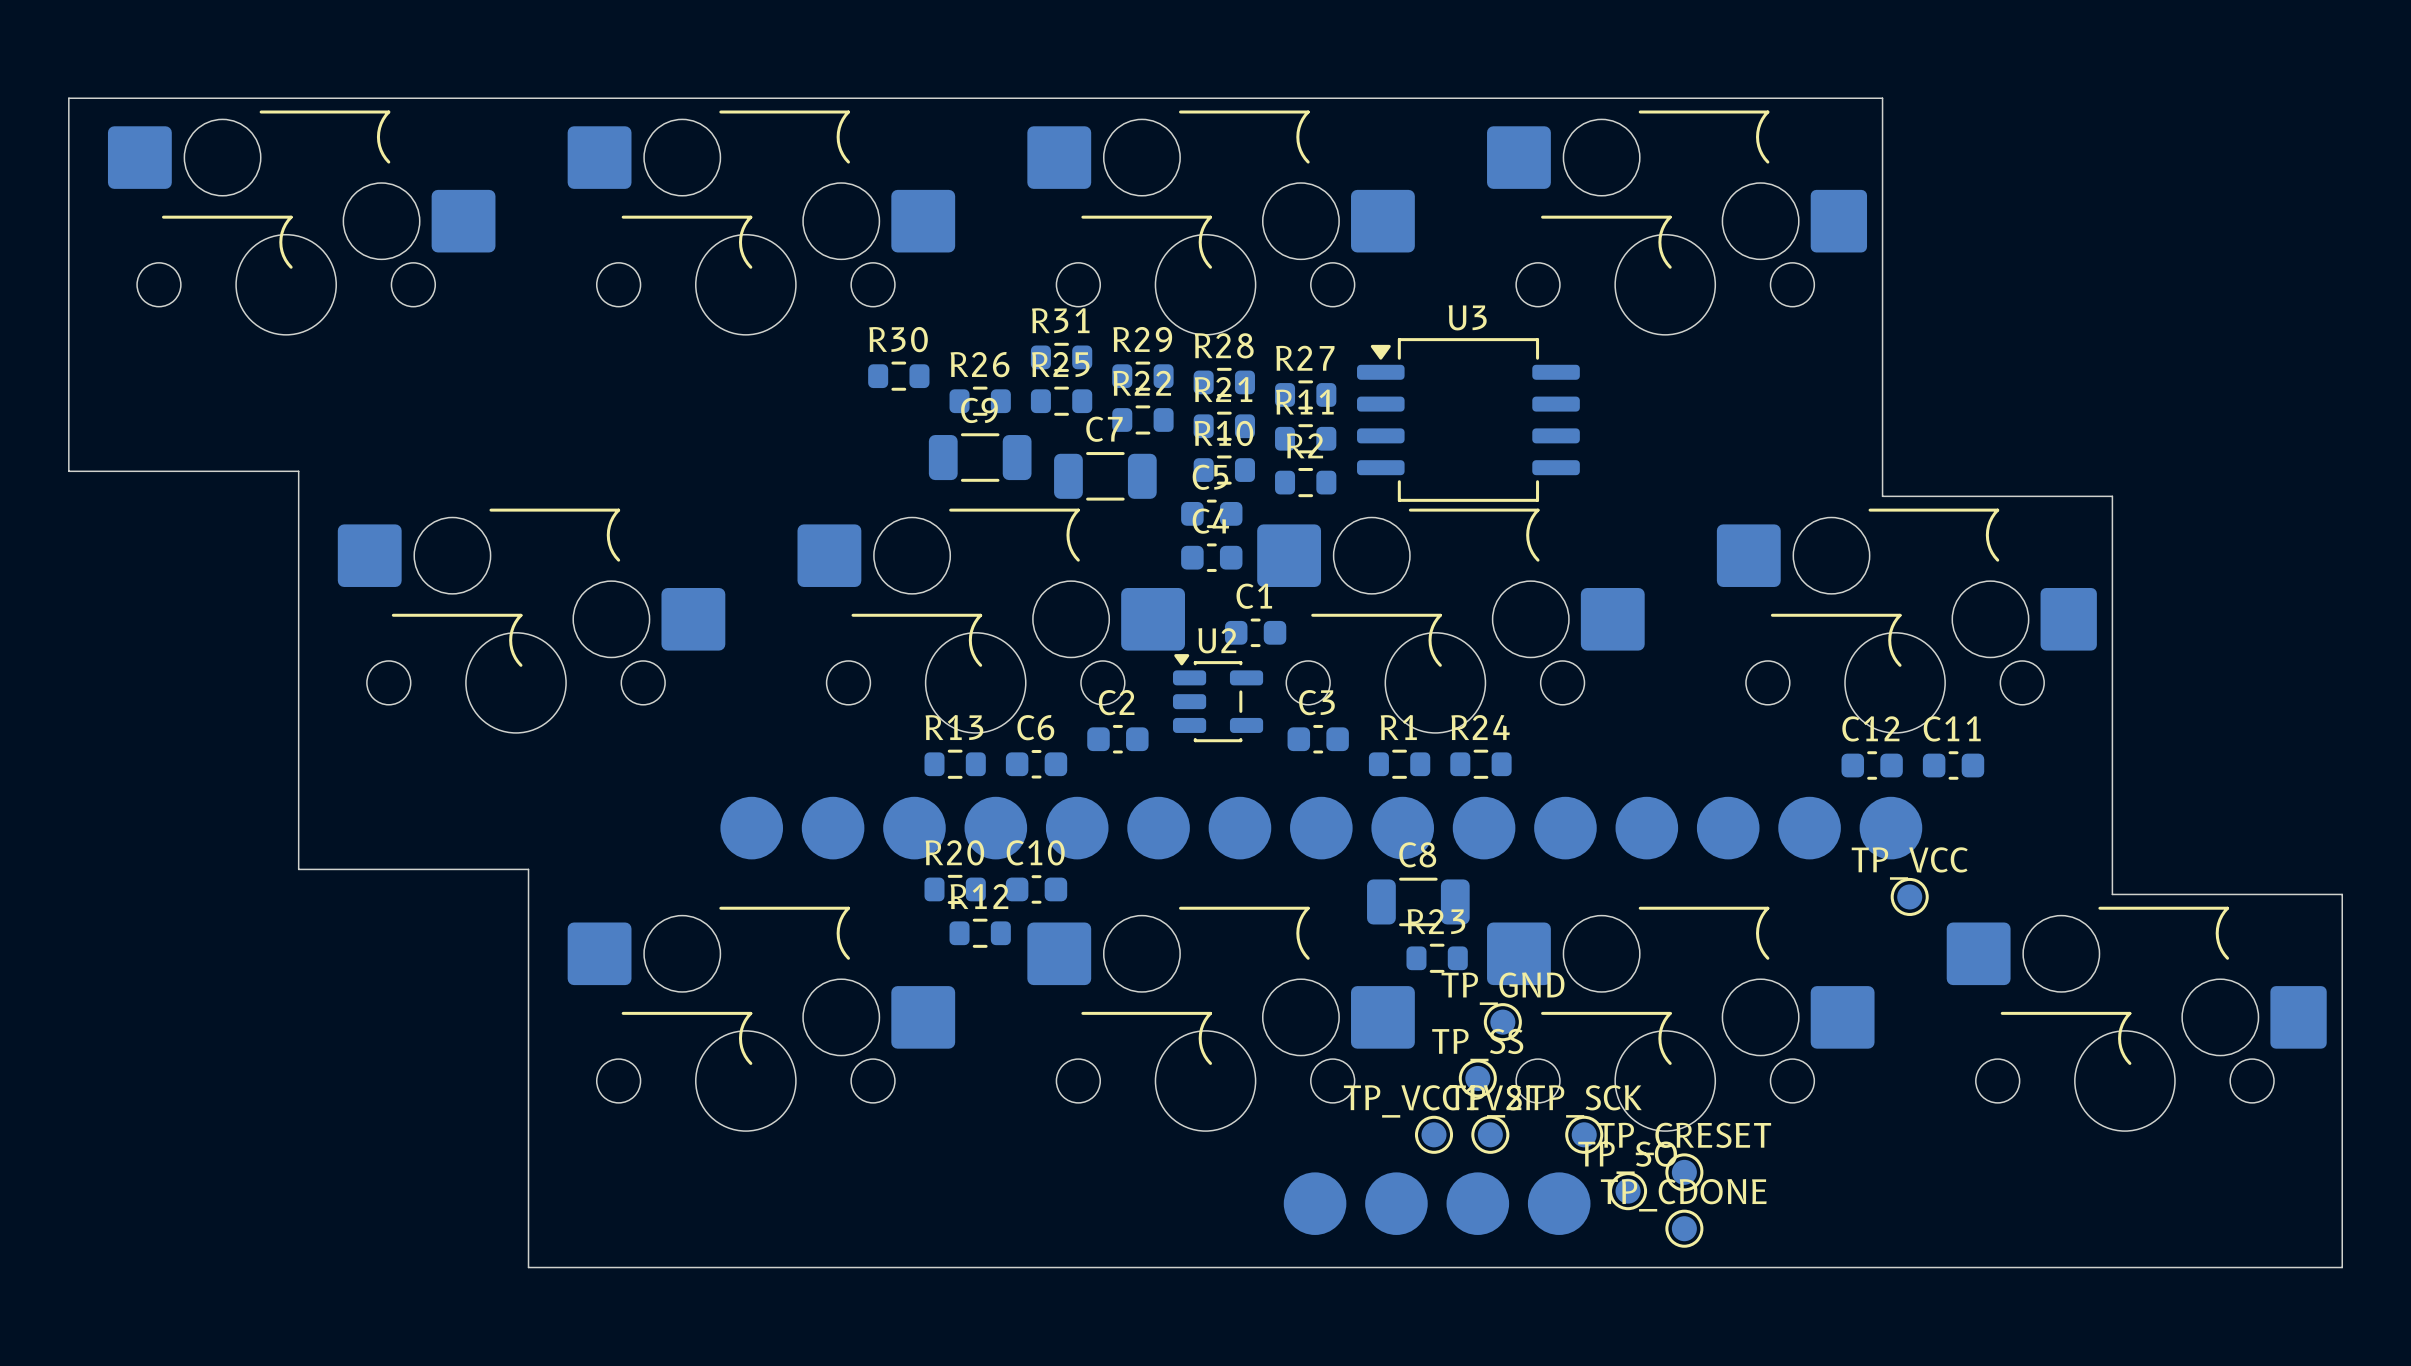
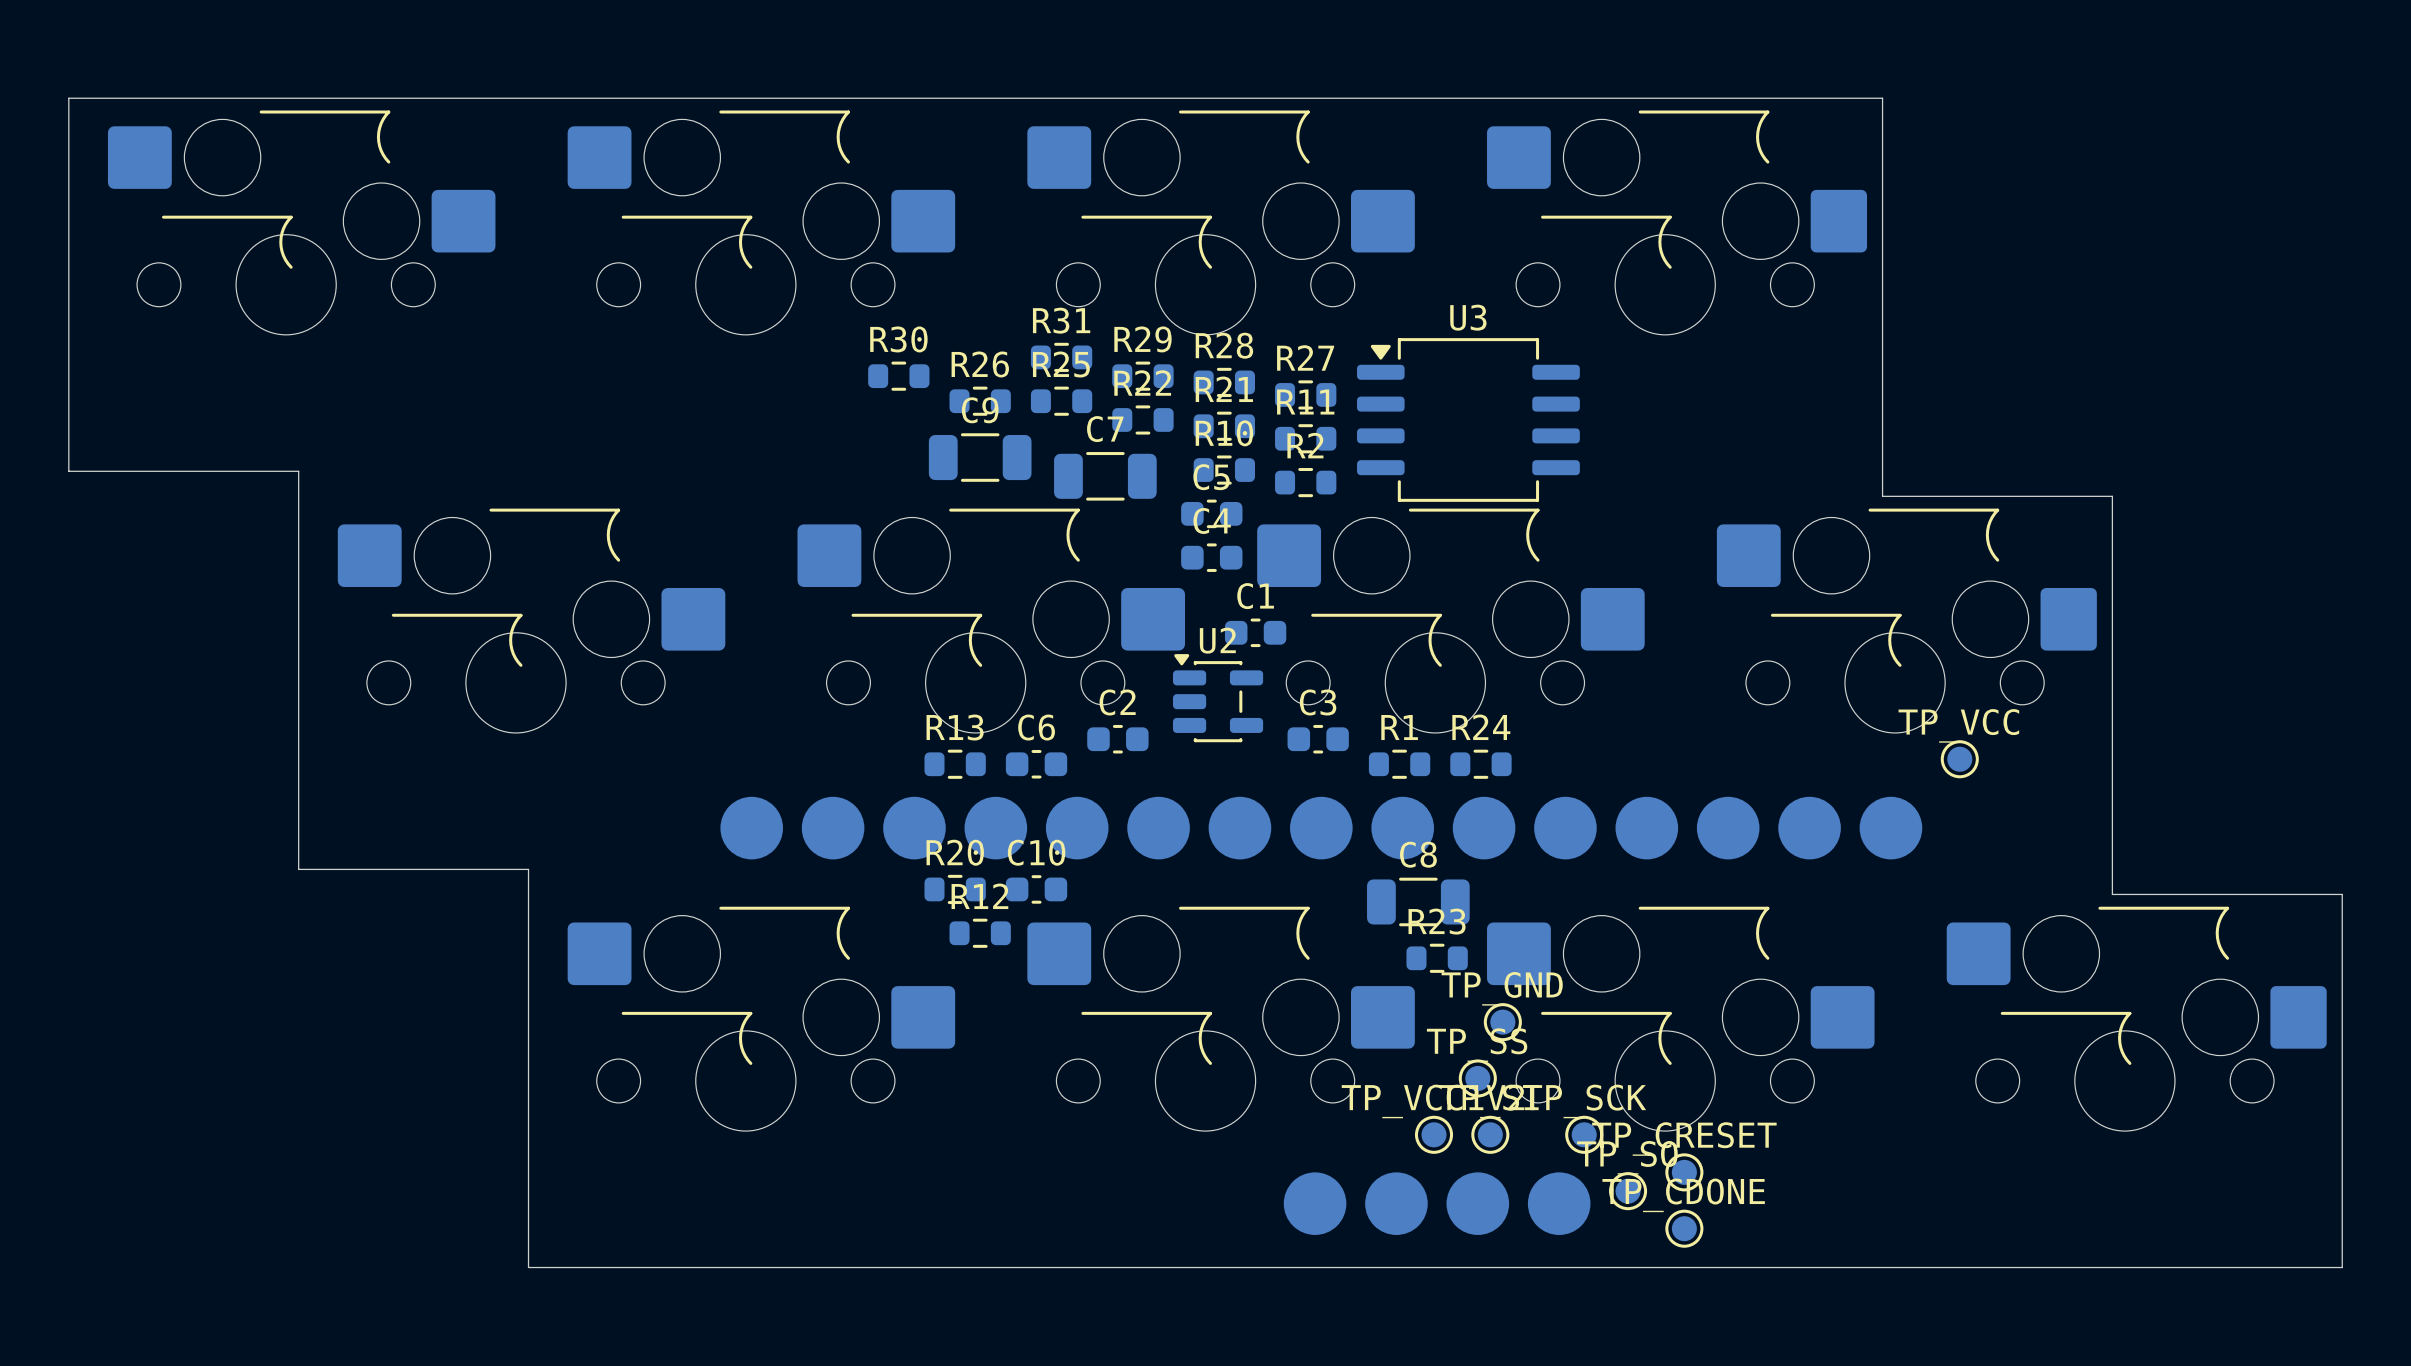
C12: (1872, 765) -> none
C11: (1953, 765) -> none
TP_VCC position: (1909, 896) -> (1959, 759)

